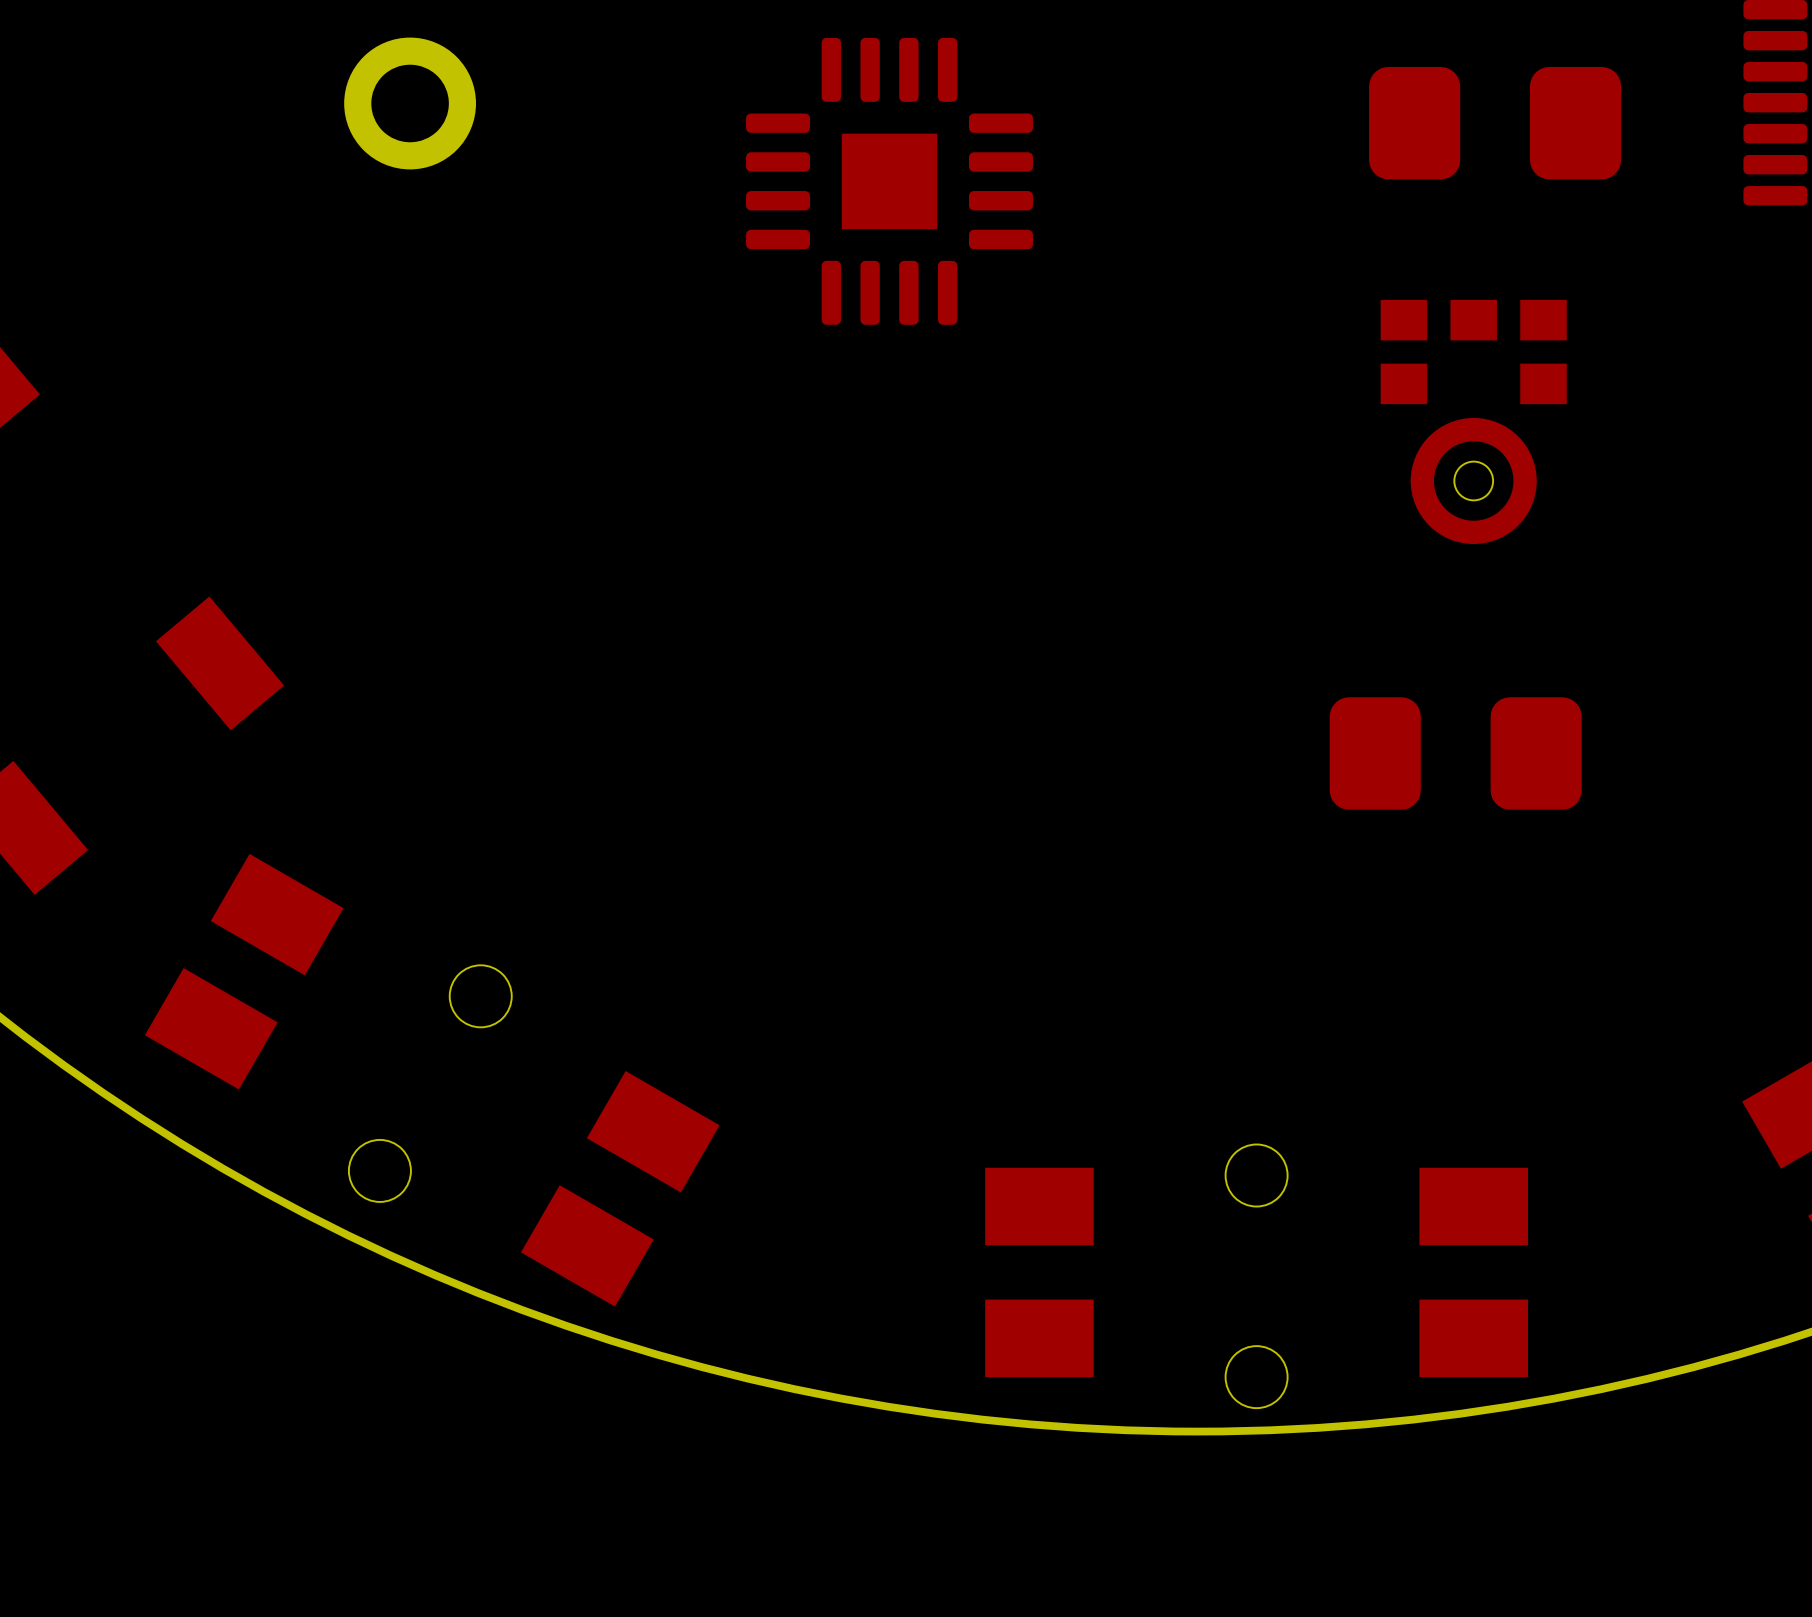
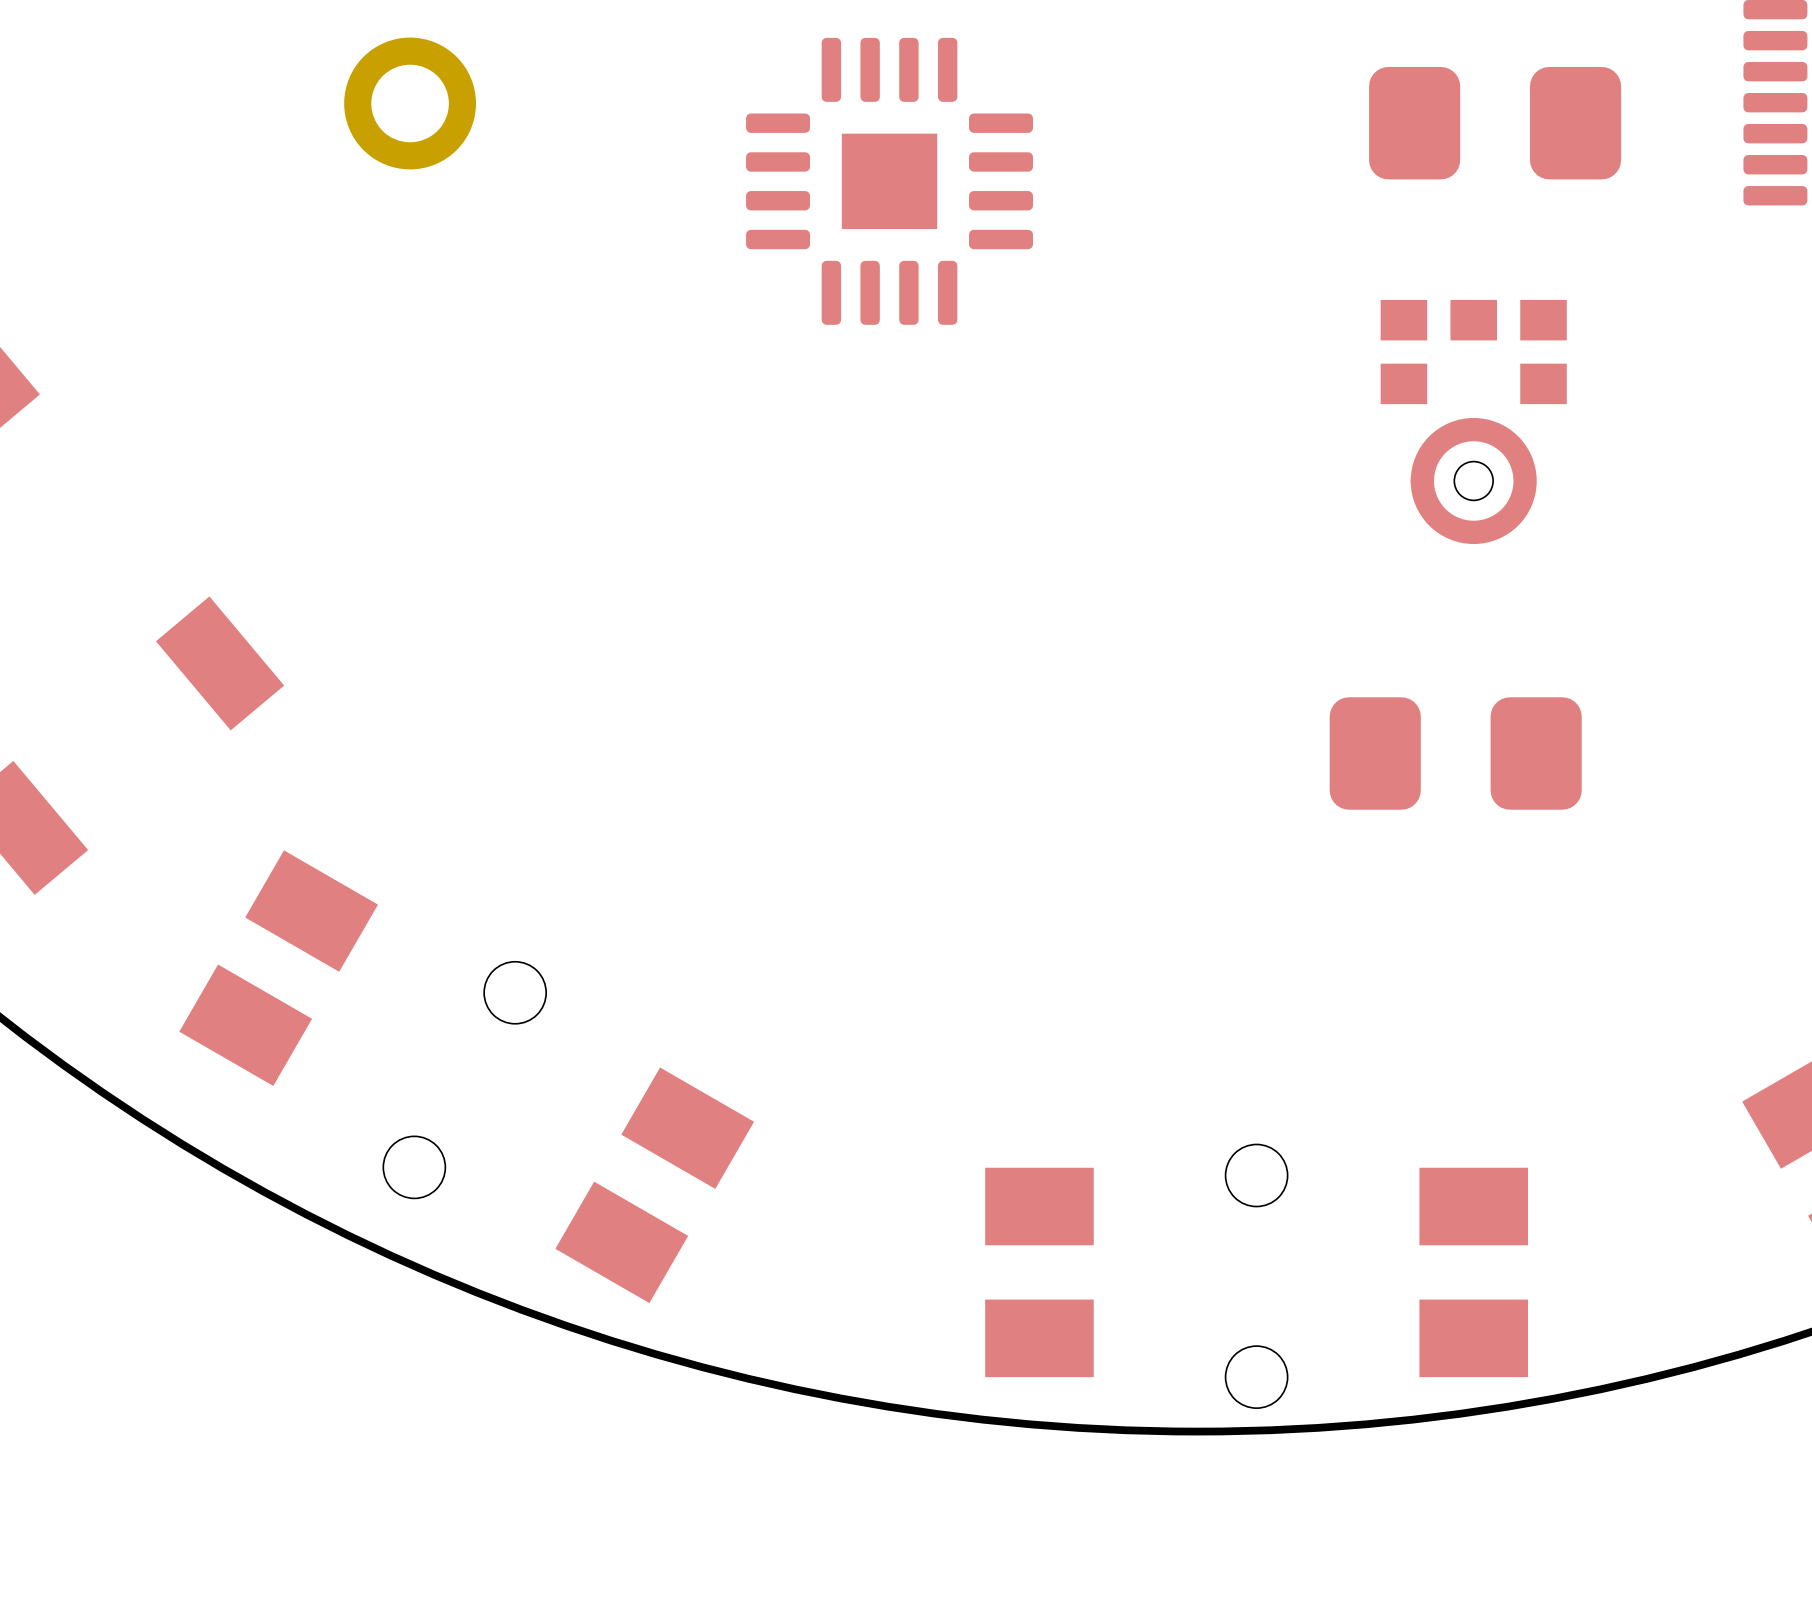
part position: (432, 1080) -> (466, 1076)

